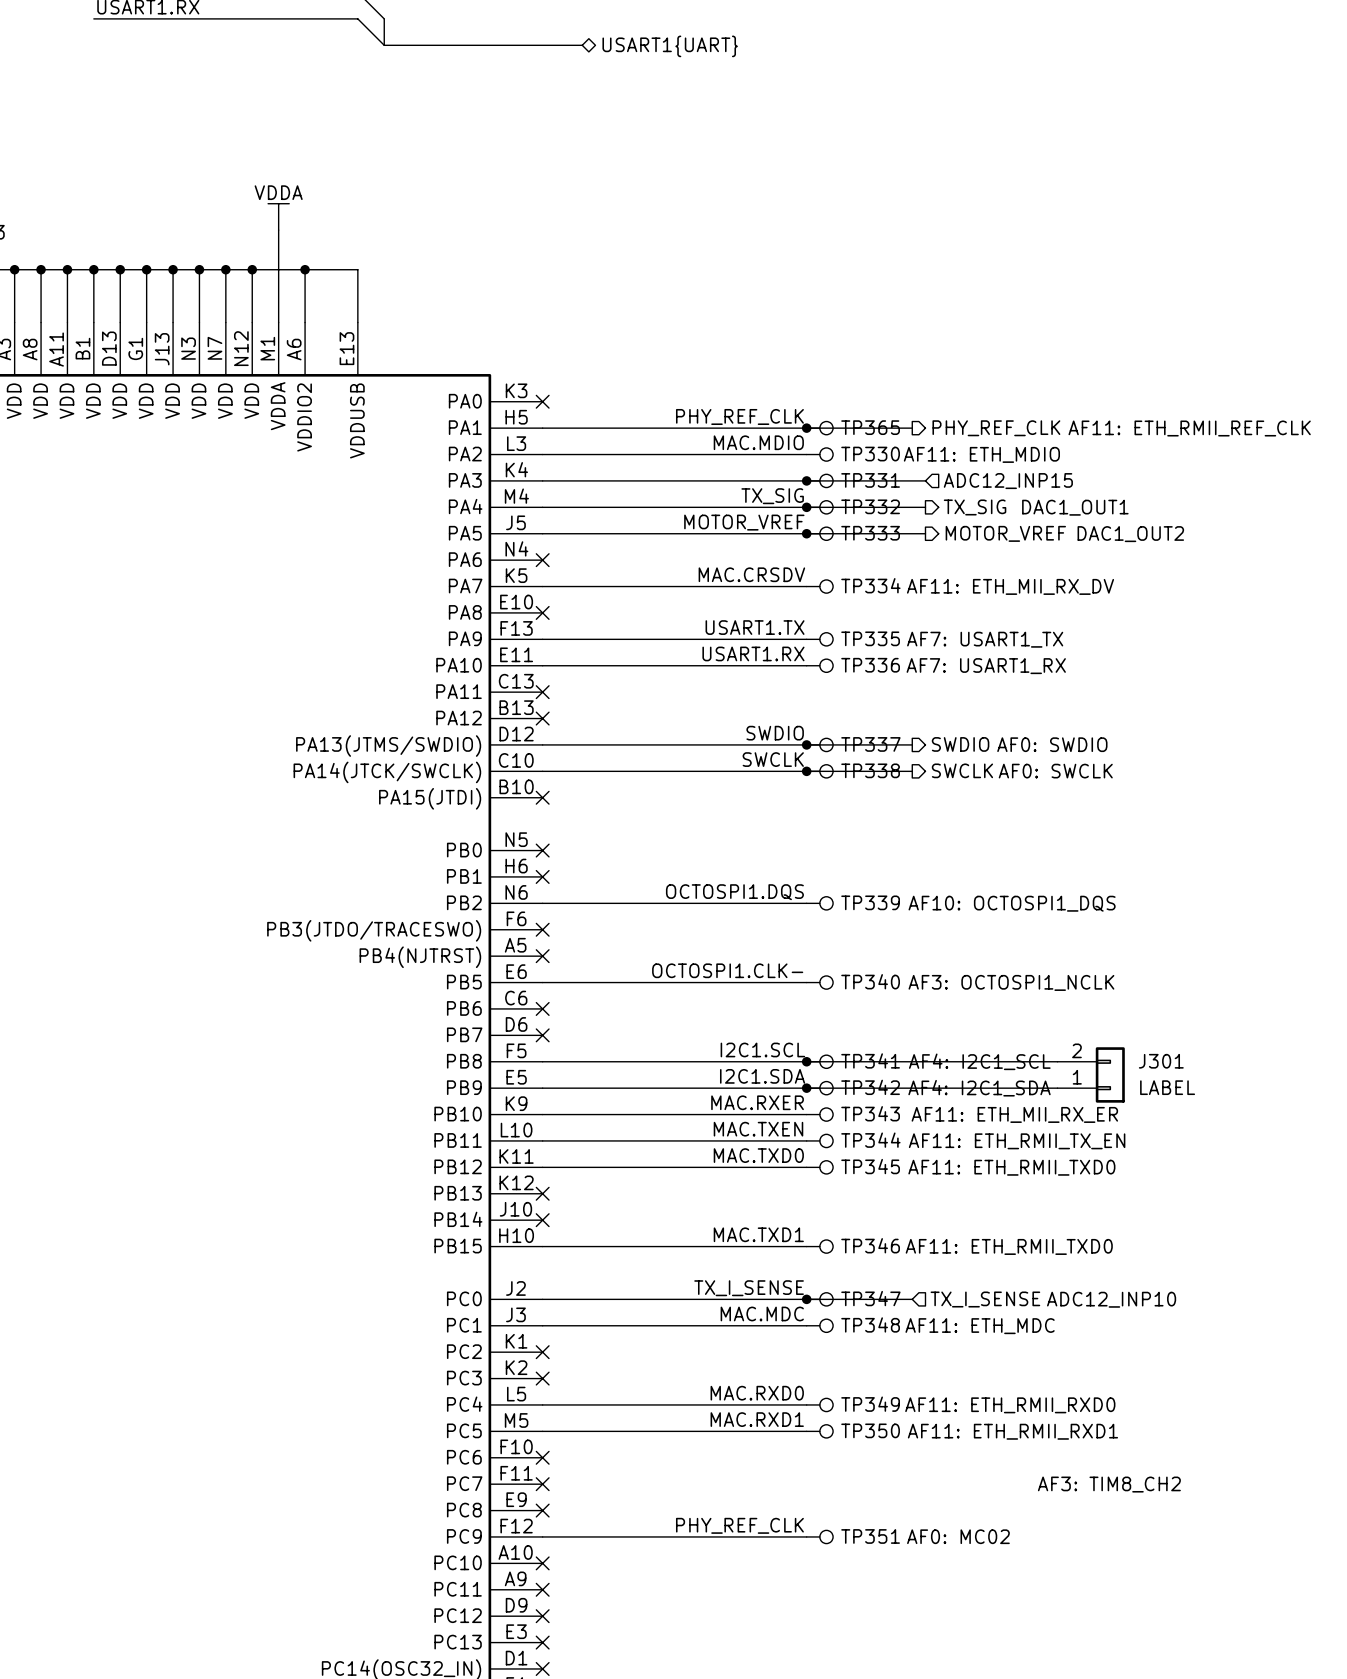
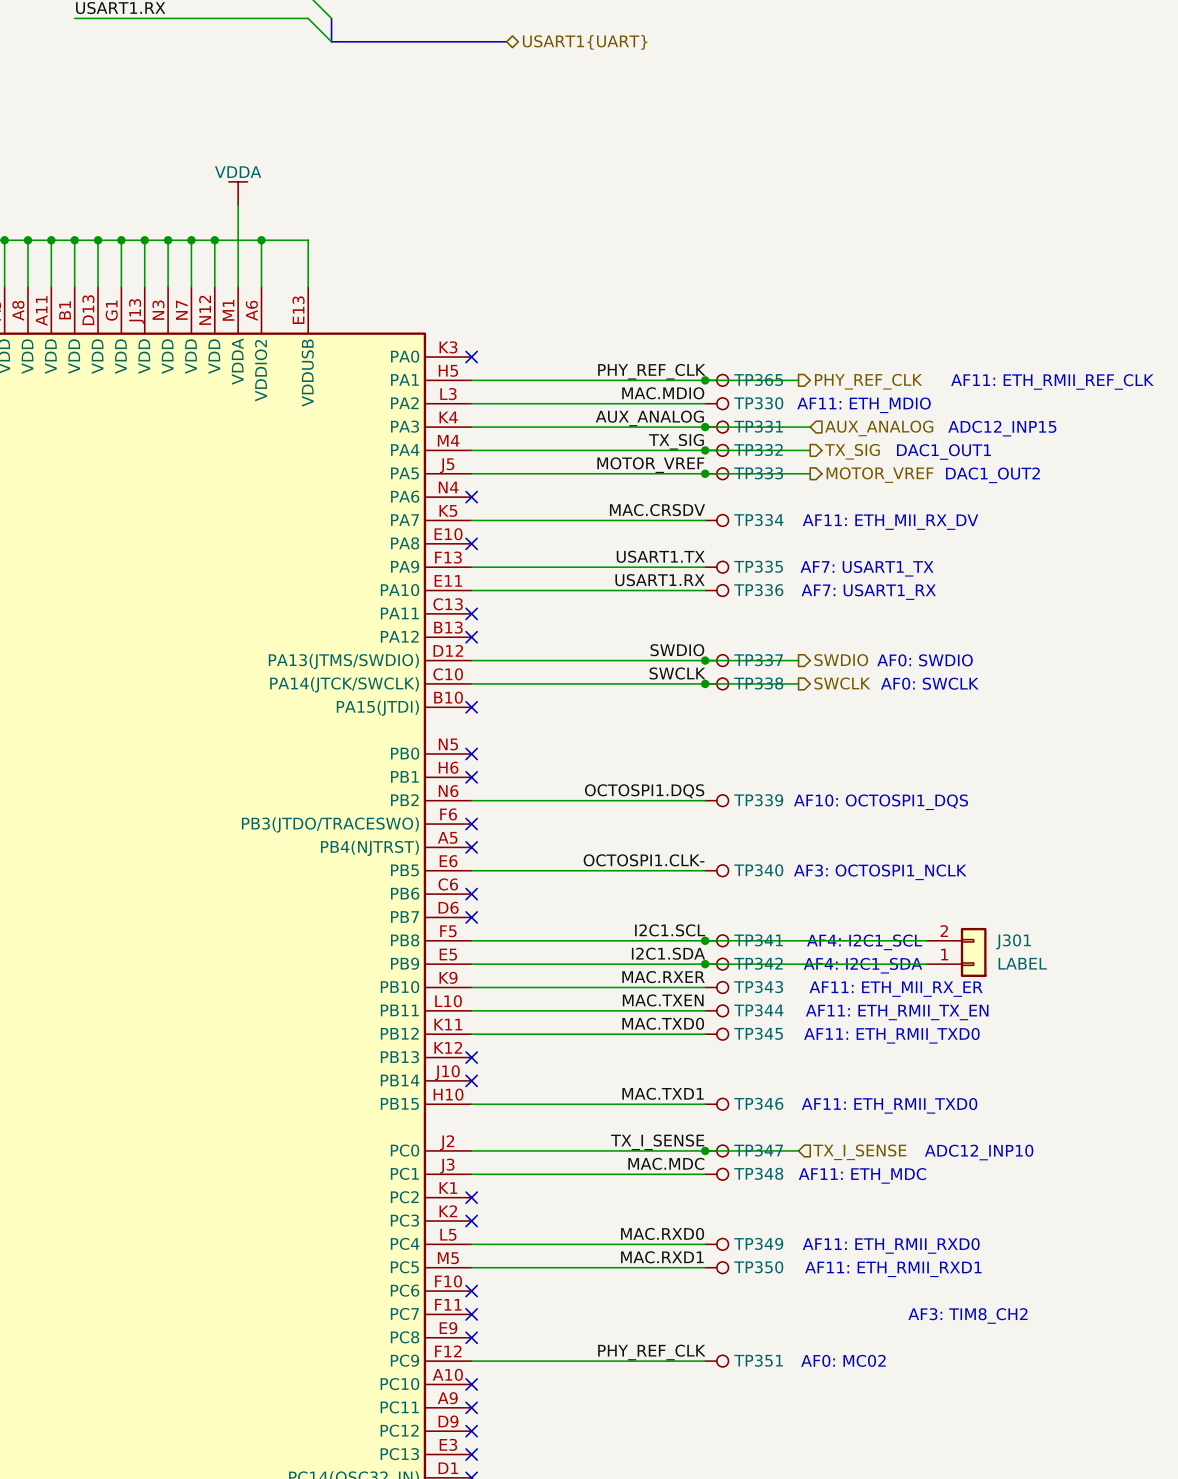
label: none -> AUX_ANALOG (649, 418)
hierarchical label: ADC12_INP15 (1008, 481) -> AUX_ANALOG (879, 428)
text: none -> ADC12_INP15 (1002, 428)

